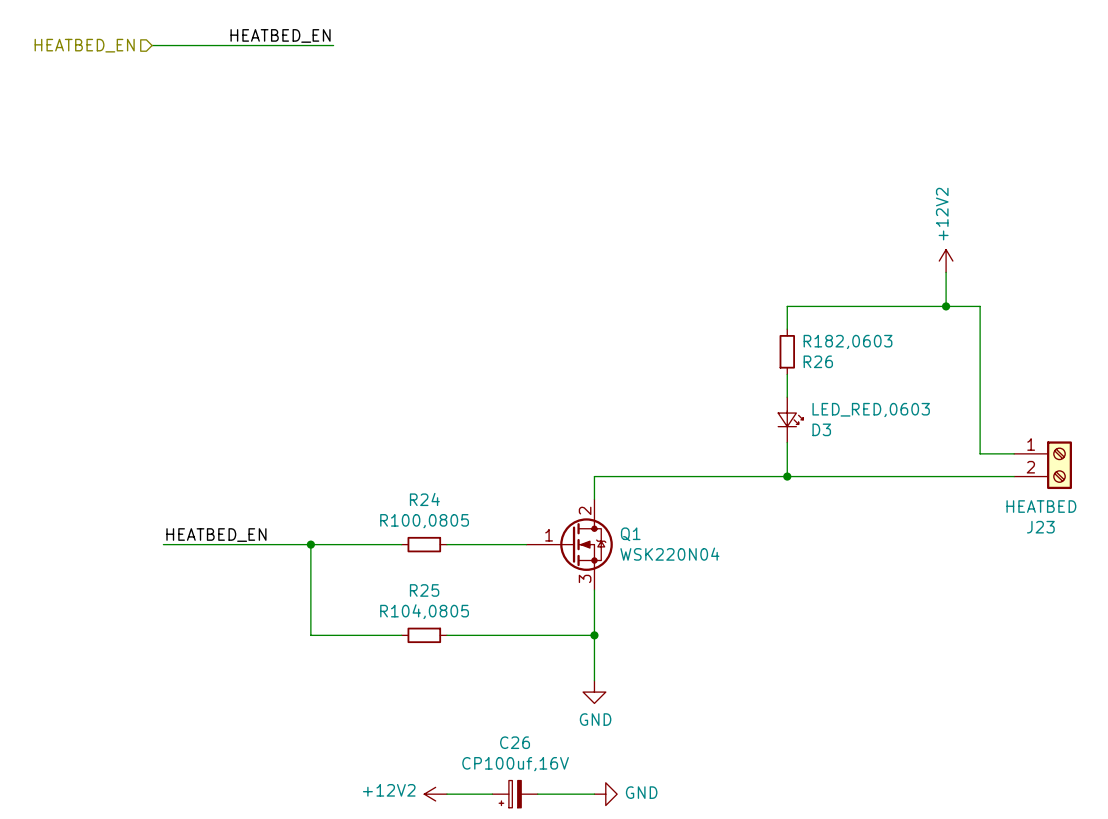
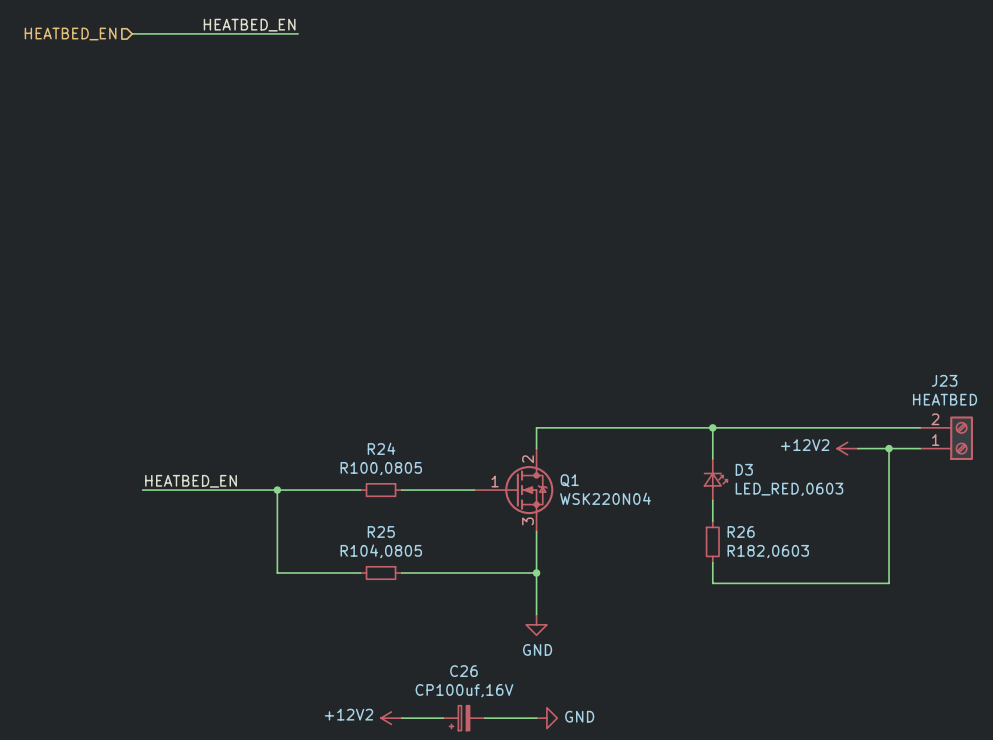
power symbol: +12V2 (946, 261) -> none
wire: (946, 272) (946, 306) -> none
junction: (946, 306) -> none
wire: (787, 329) (787, 306) (980, 306) (980, 453) (1014, 453) -> none
R26 value position: R182,0603 (848, 341) -> R182,0603 (768, 551)
R26 position: (787, 351) -> (712, 541)
R26 name position: R26 (818, 361) -> R26 (741, 531)
wire: (787, 374) (787, 397) -> (712, 500) (712, 521)
D3 flip: as is (790, 418) -> up-down (715, 480)
D3 position: (790, 419) -> (715, 479)
wire: (787, 442) (787, 476) -> (712, 458) (712, 427)
J23 flip: as is (1059, 465) -> up-down (961, 438)
power symbol: none -> +12V2 (847, 448)
wire: none -> (857, 448) (920, 448)
wire: none -> (889, 448) (889, 583) (712, 583) (712, 562)
junction: none -> (889, 448)

